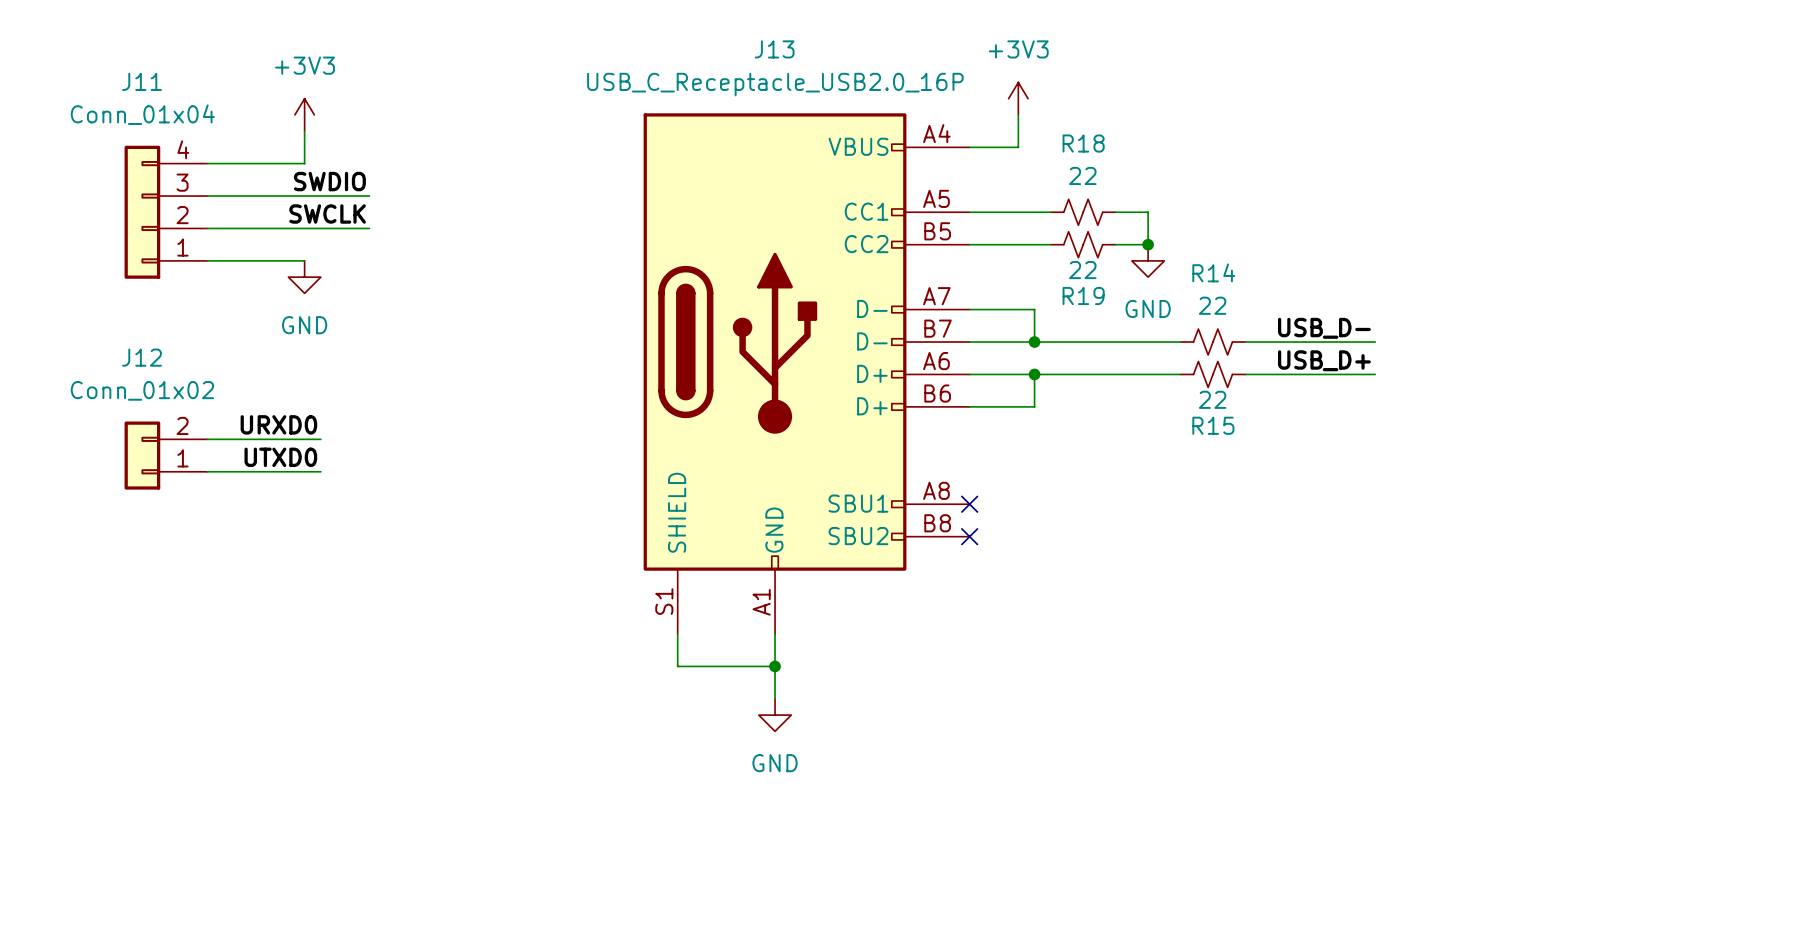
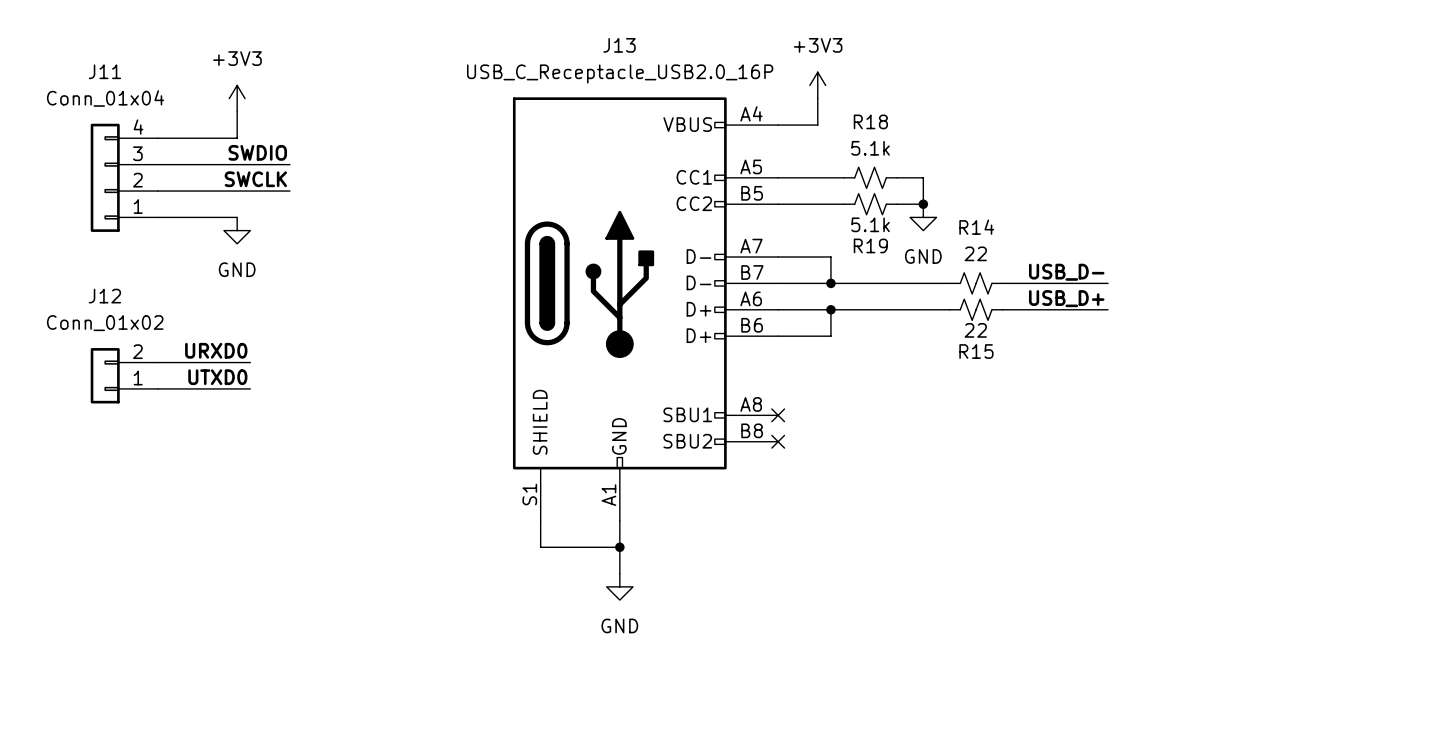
R18 value: 22 (1082, 175) -> 5.1k (870, 148)
R19 value: 22 (1082, 270) -> 5.1k (870, 224)

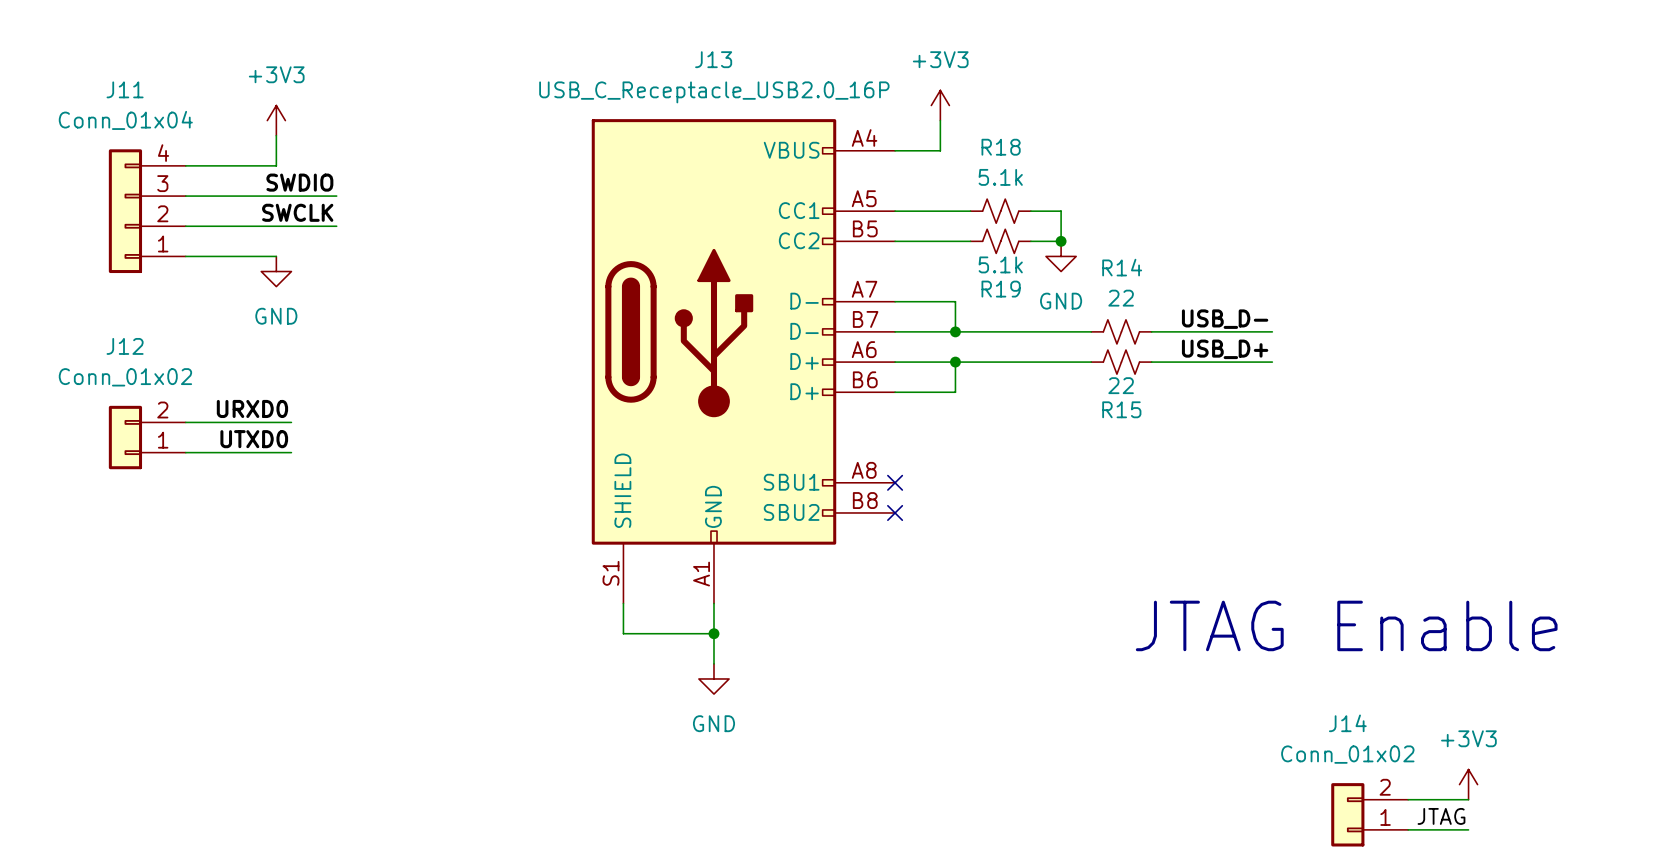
text: none -> JTAG Enable (1346, 625)
power symbol: none -> +3V3 (1468, 784)
wire: none -> (1408, 799) (1468, 799)
J14: none -> Conn_01x02 (1369, 814)
label: none -> JTAG (1441, 816)
wire: none -> (1408, 829) (1468, 829)

